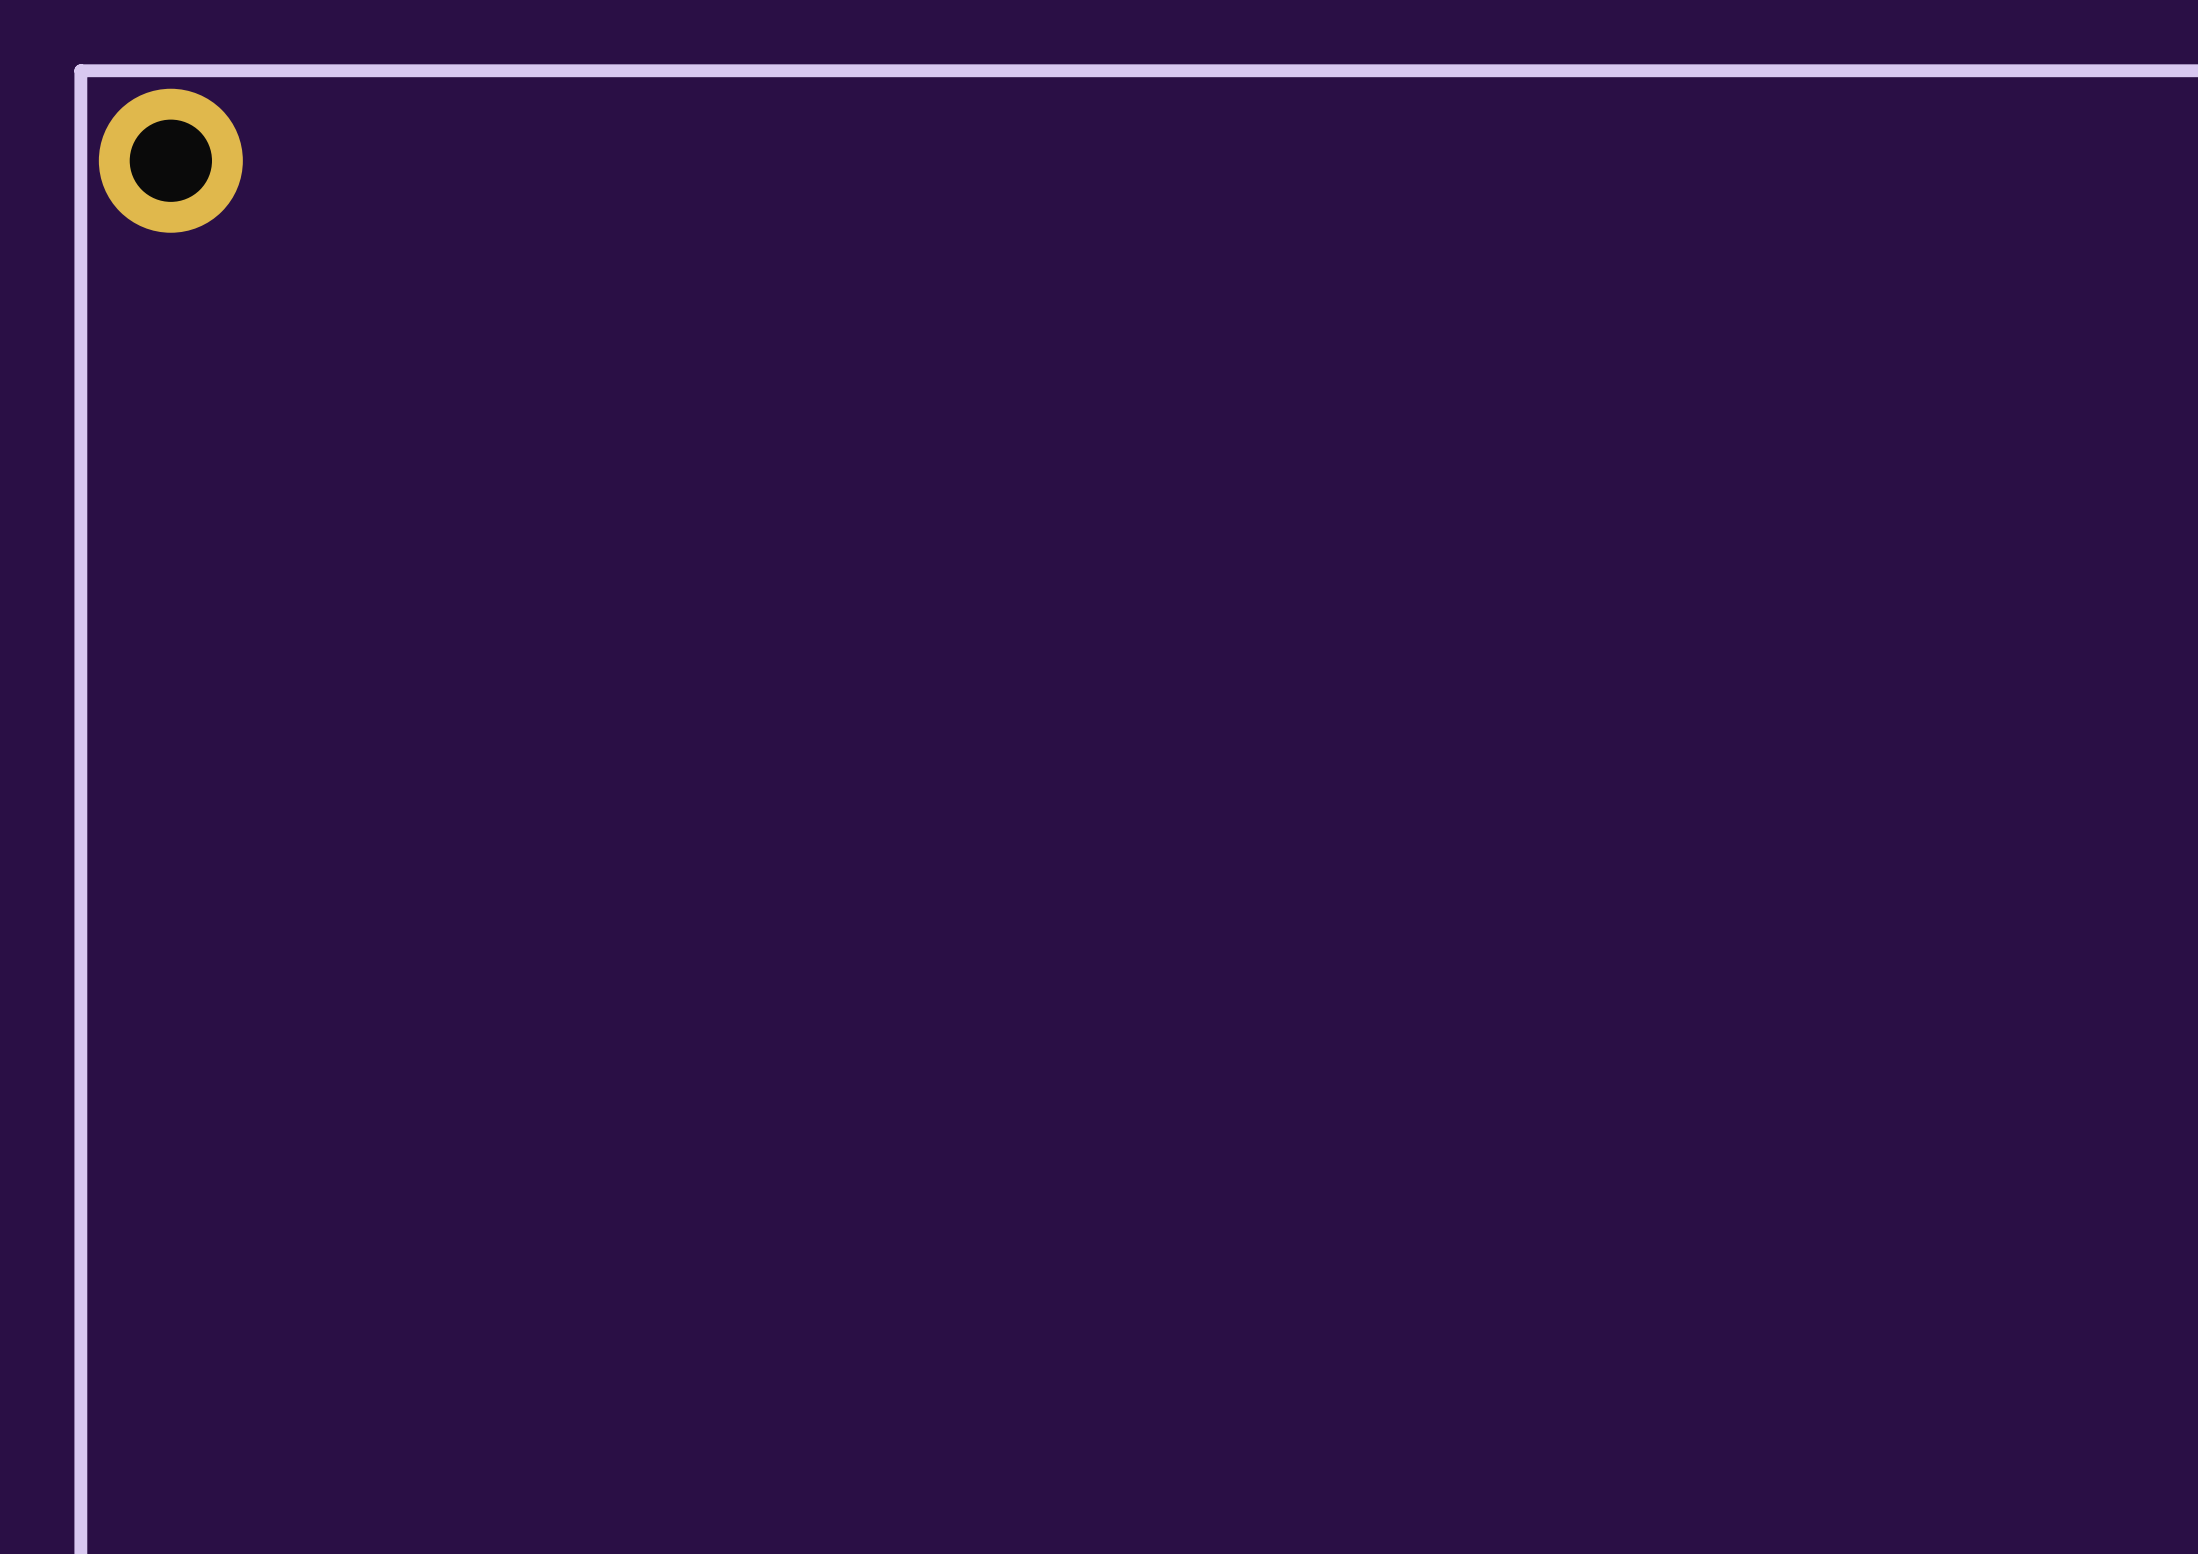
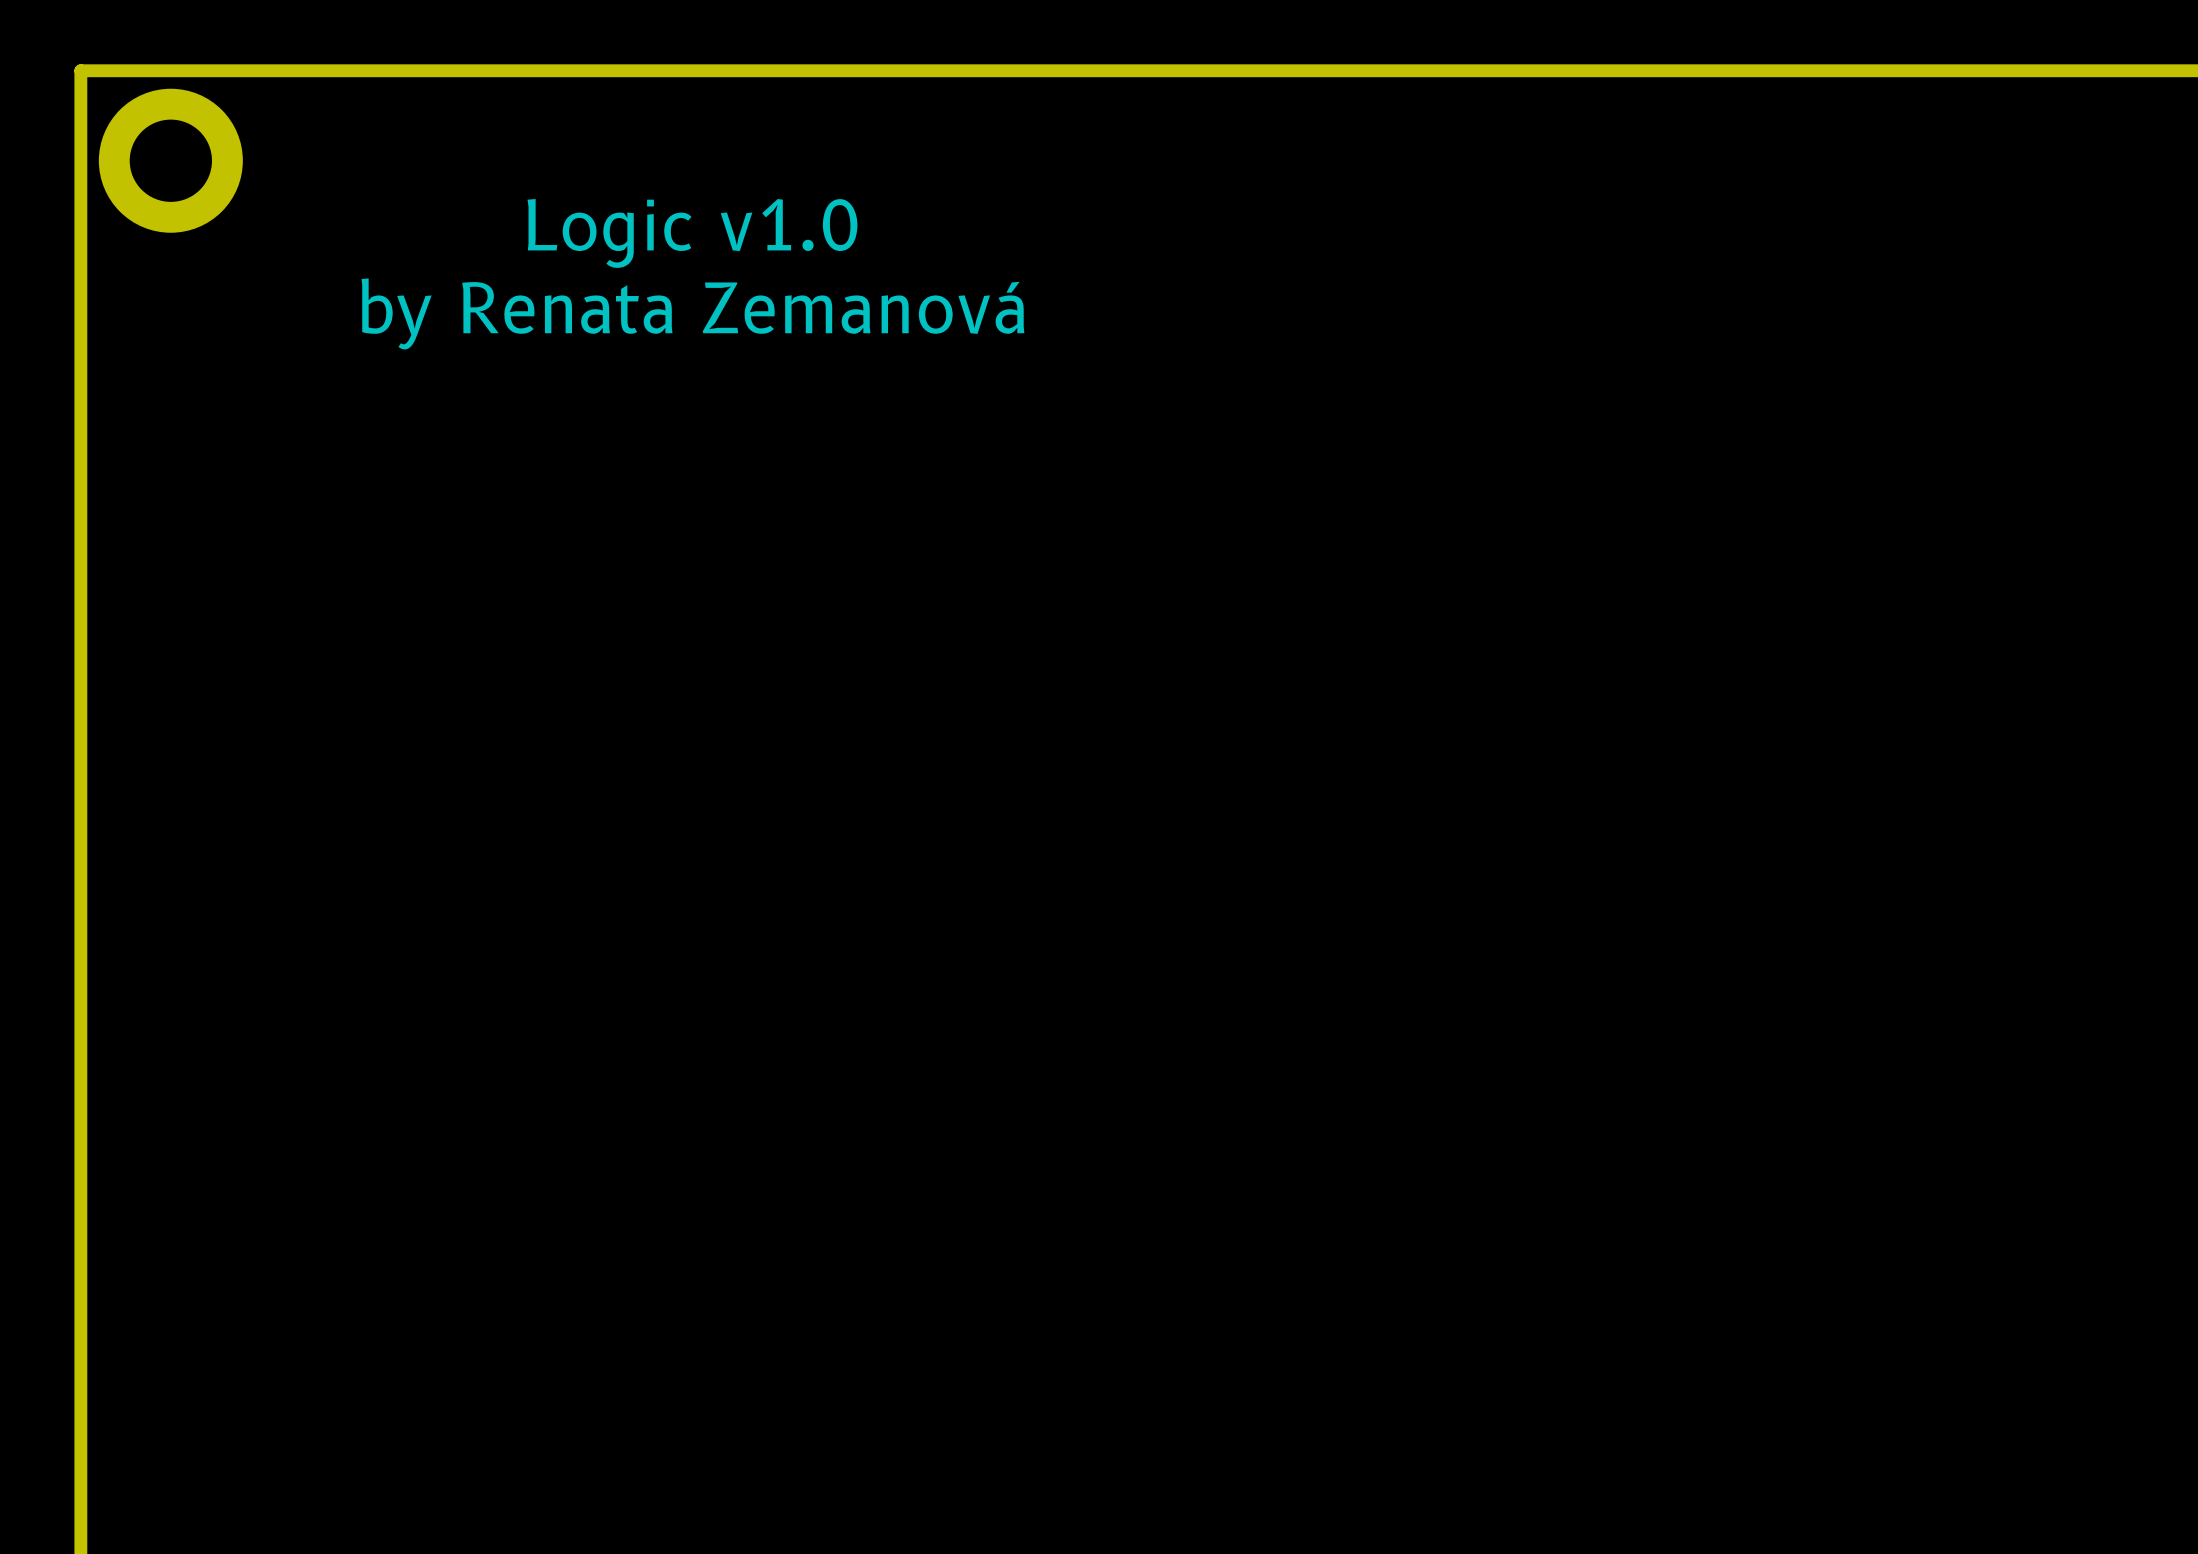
text: none -> Logic v1.0 (692, 233)
text: none -> by Renata Zemanová (692, 313)

